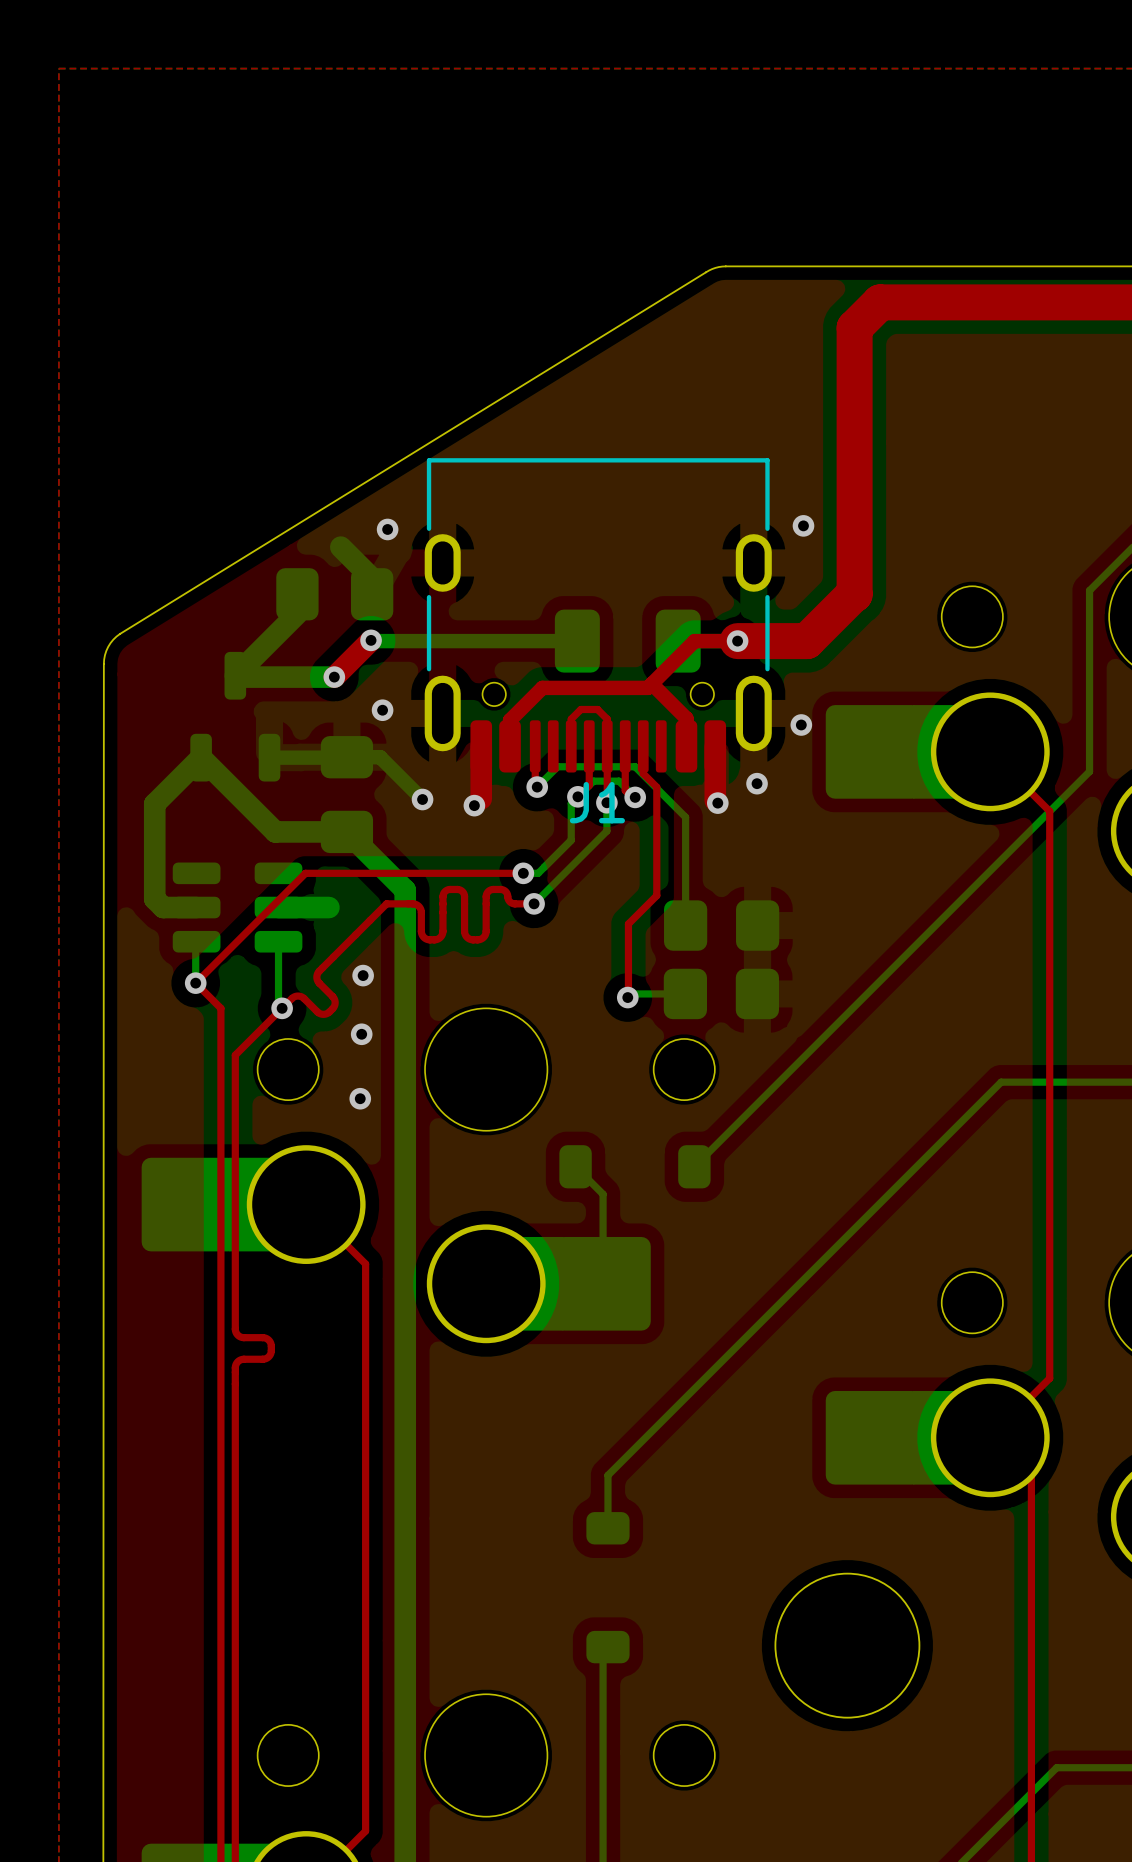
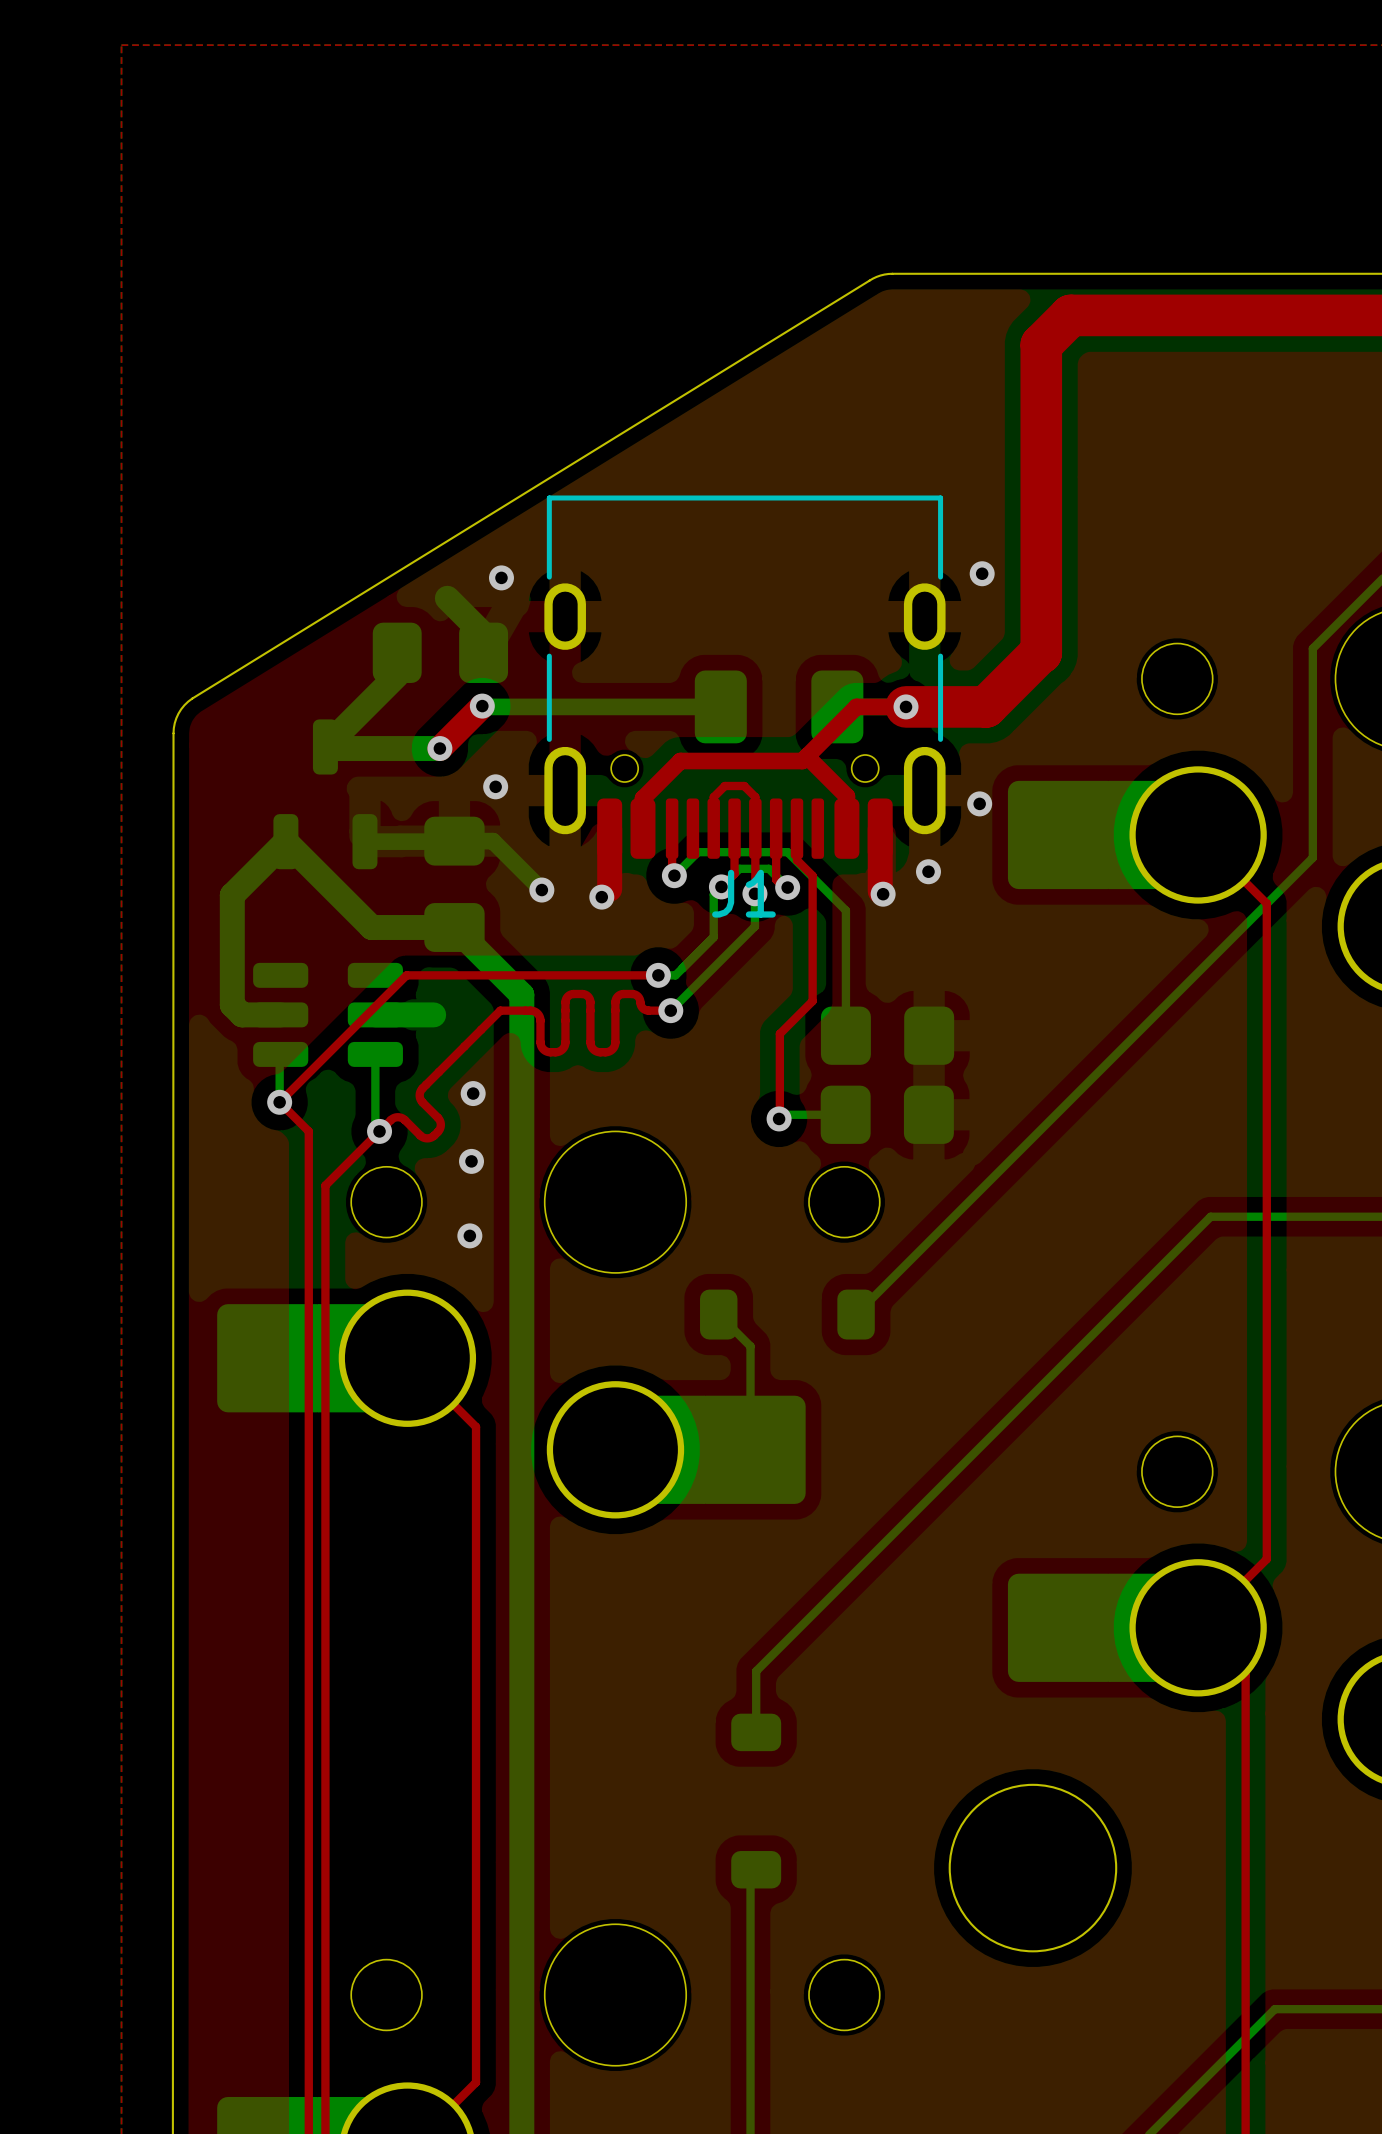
top track: (235, 1329) (236, 1333) (241, 1337) (266, 1338) (271, 1346) (270, 1353) (267, 1357) (241, 1359) (237, 1362) (235, 1367) -> (325, 1502) (325, 1547)

